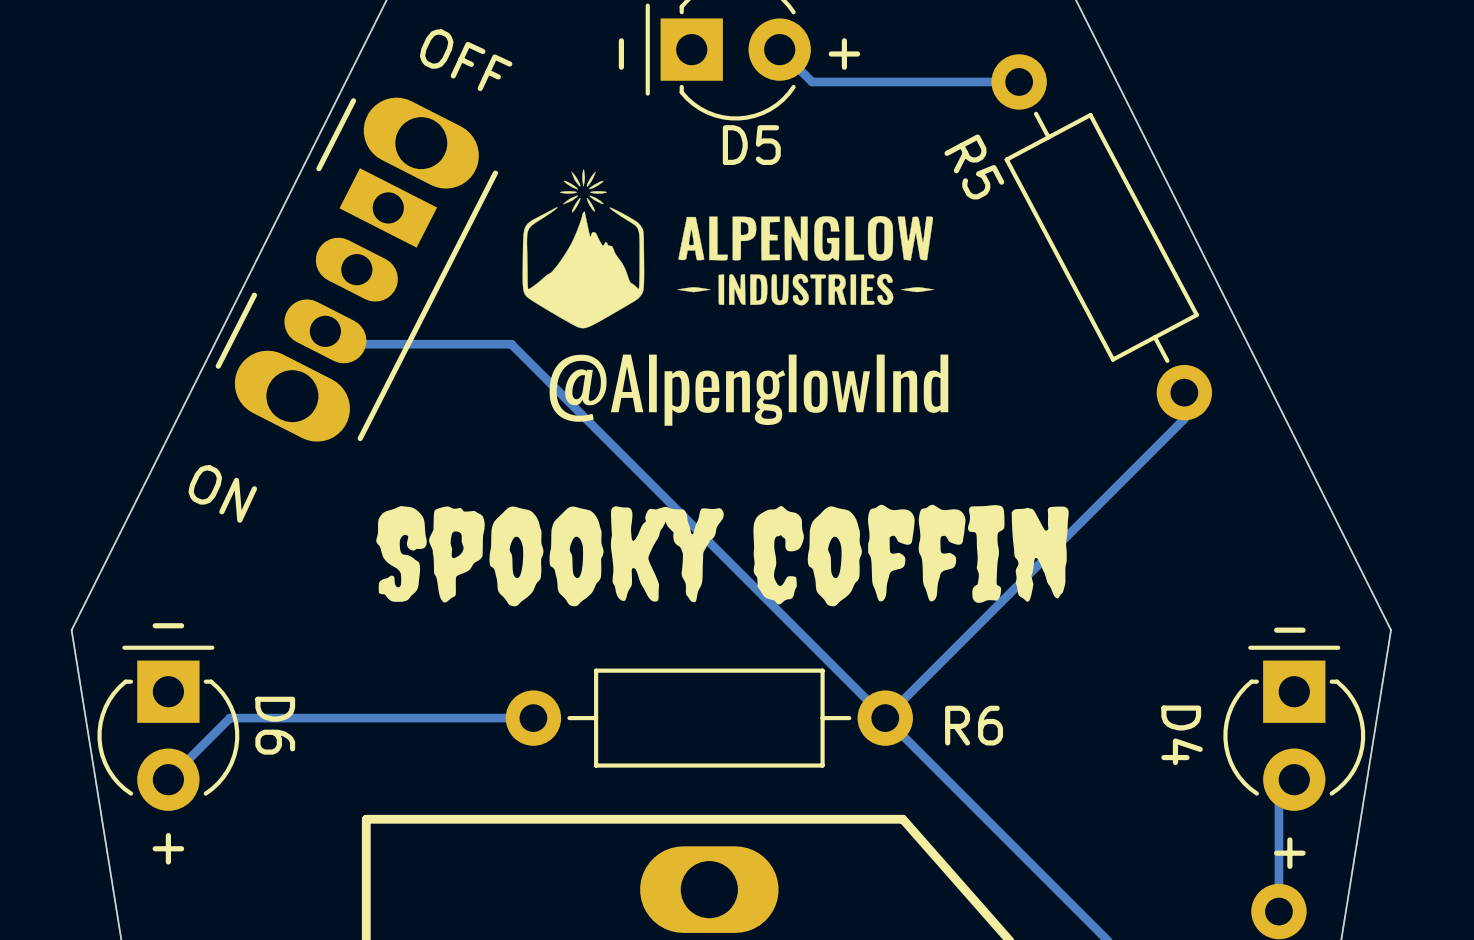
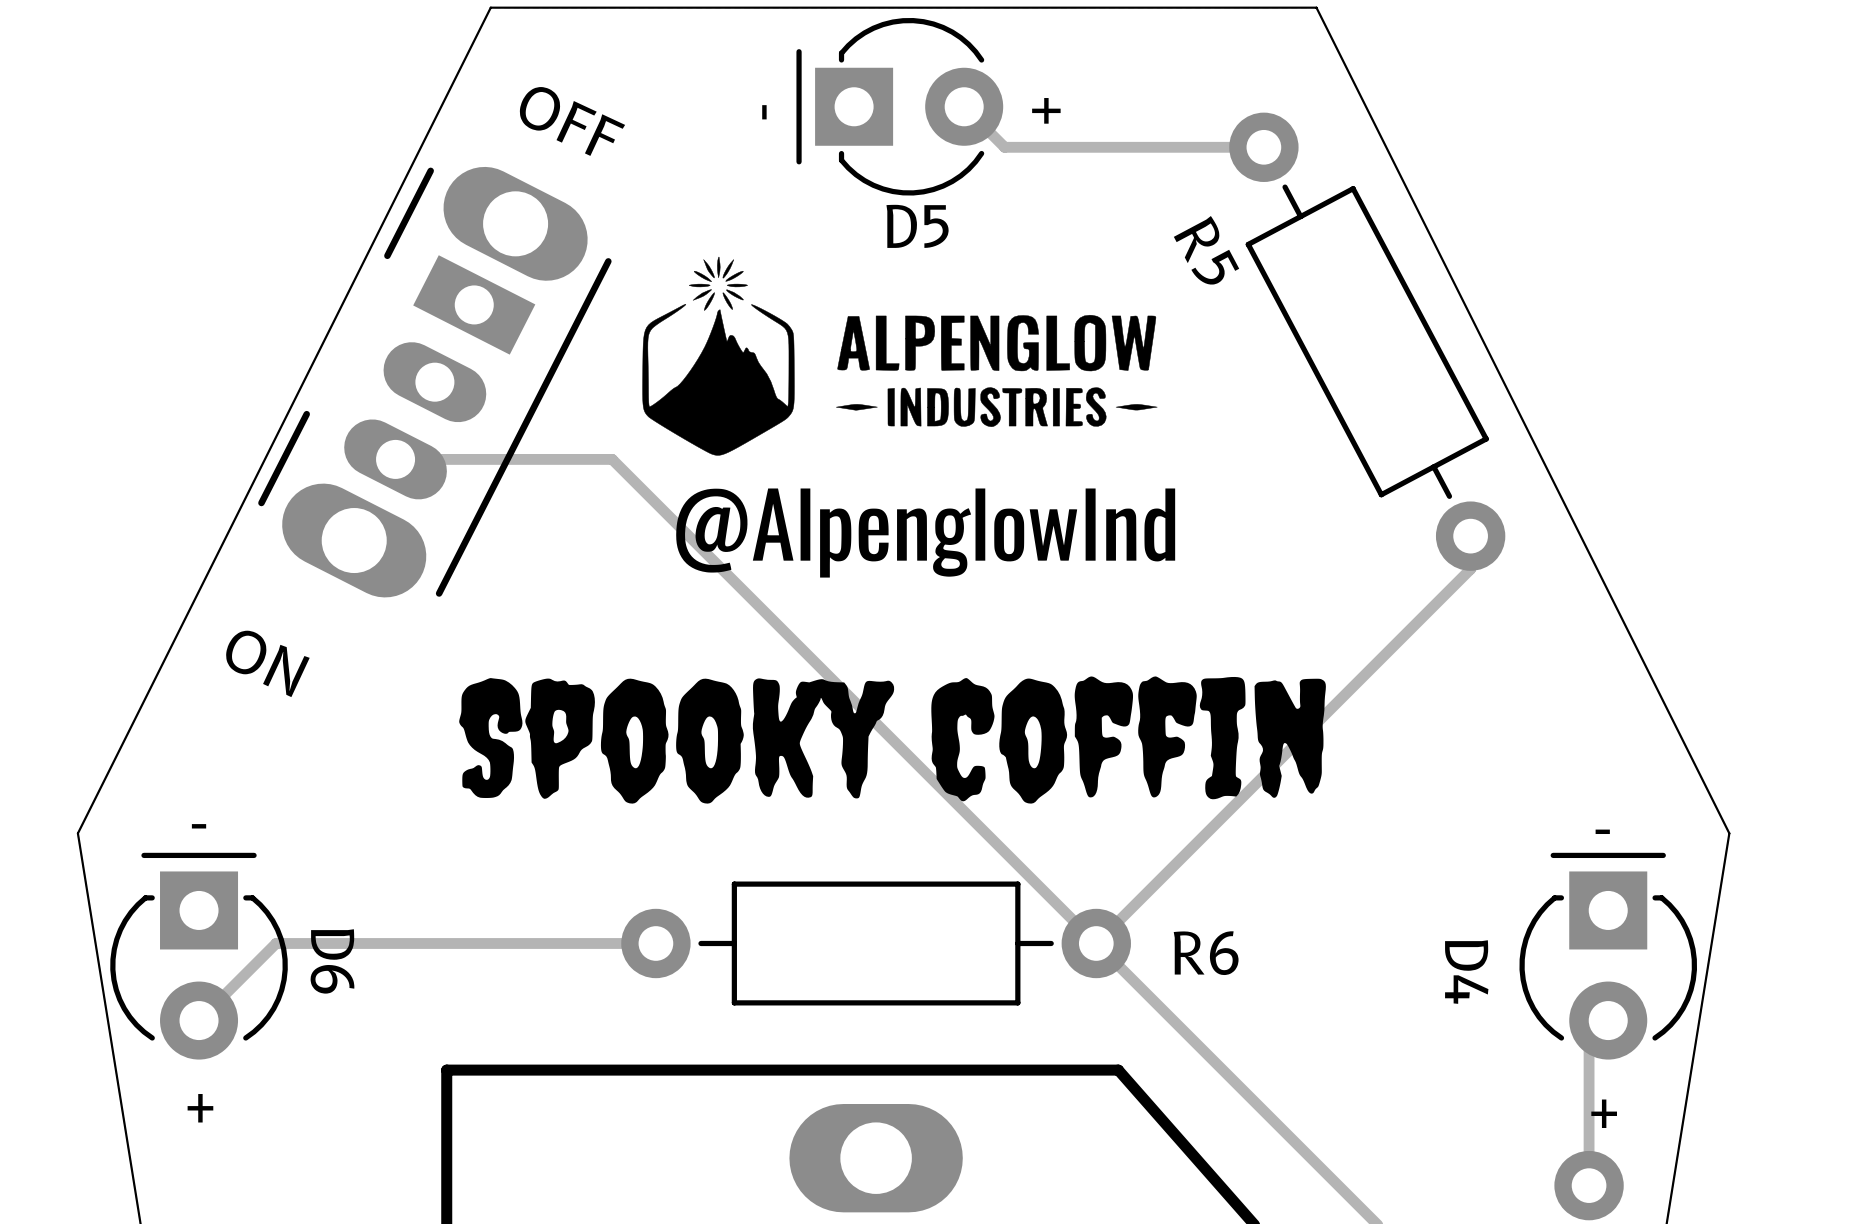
track: (325, 331) (338, 344) (511, 344) -> (395, 459) (612, 459) (628, 475)

